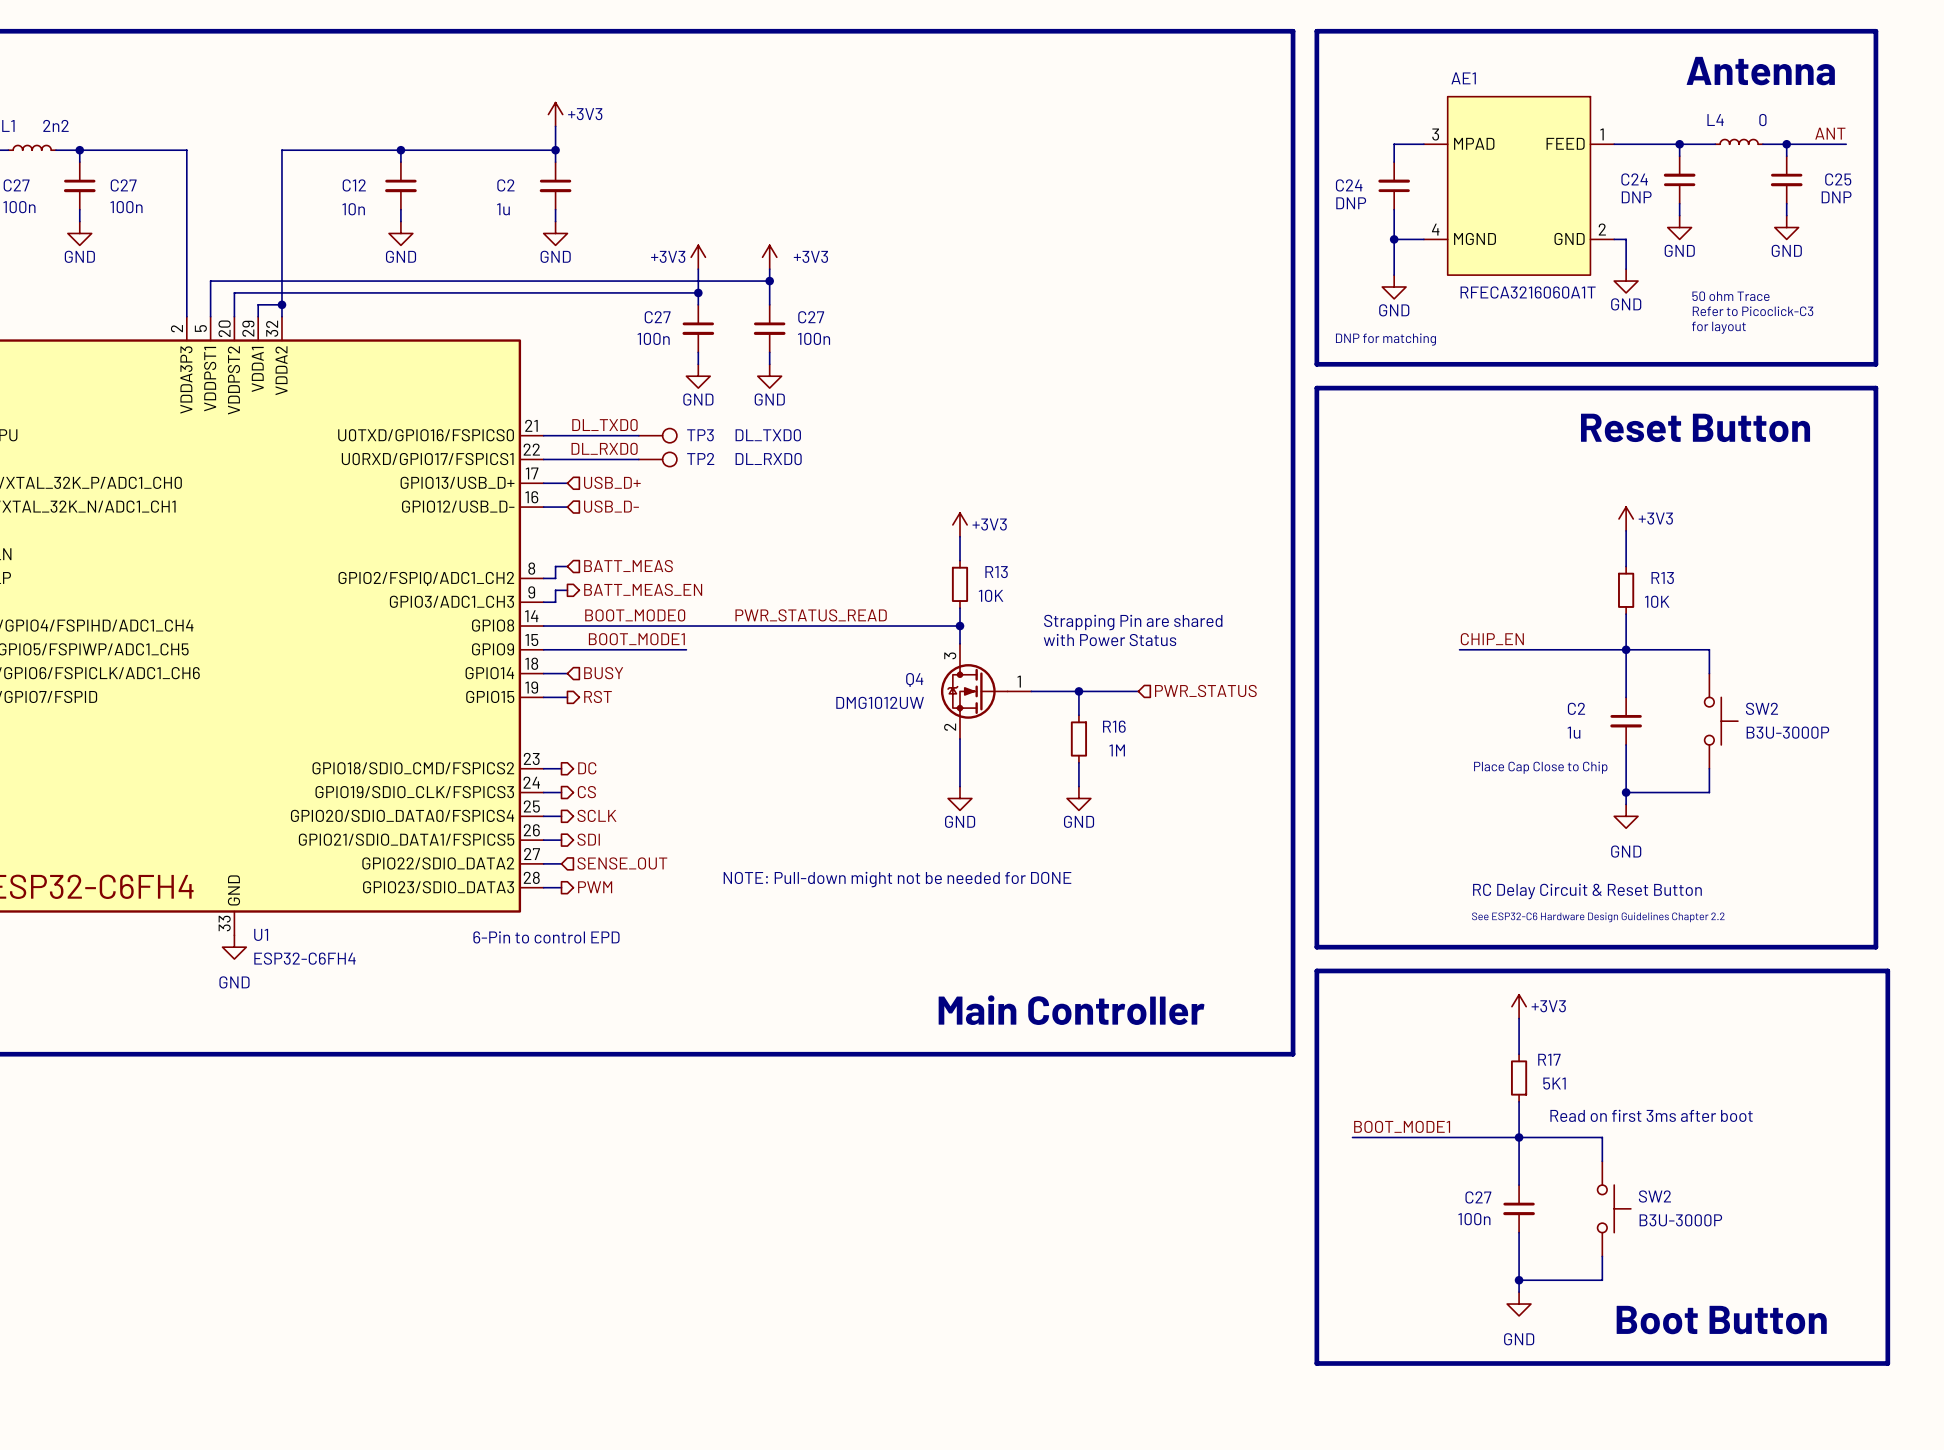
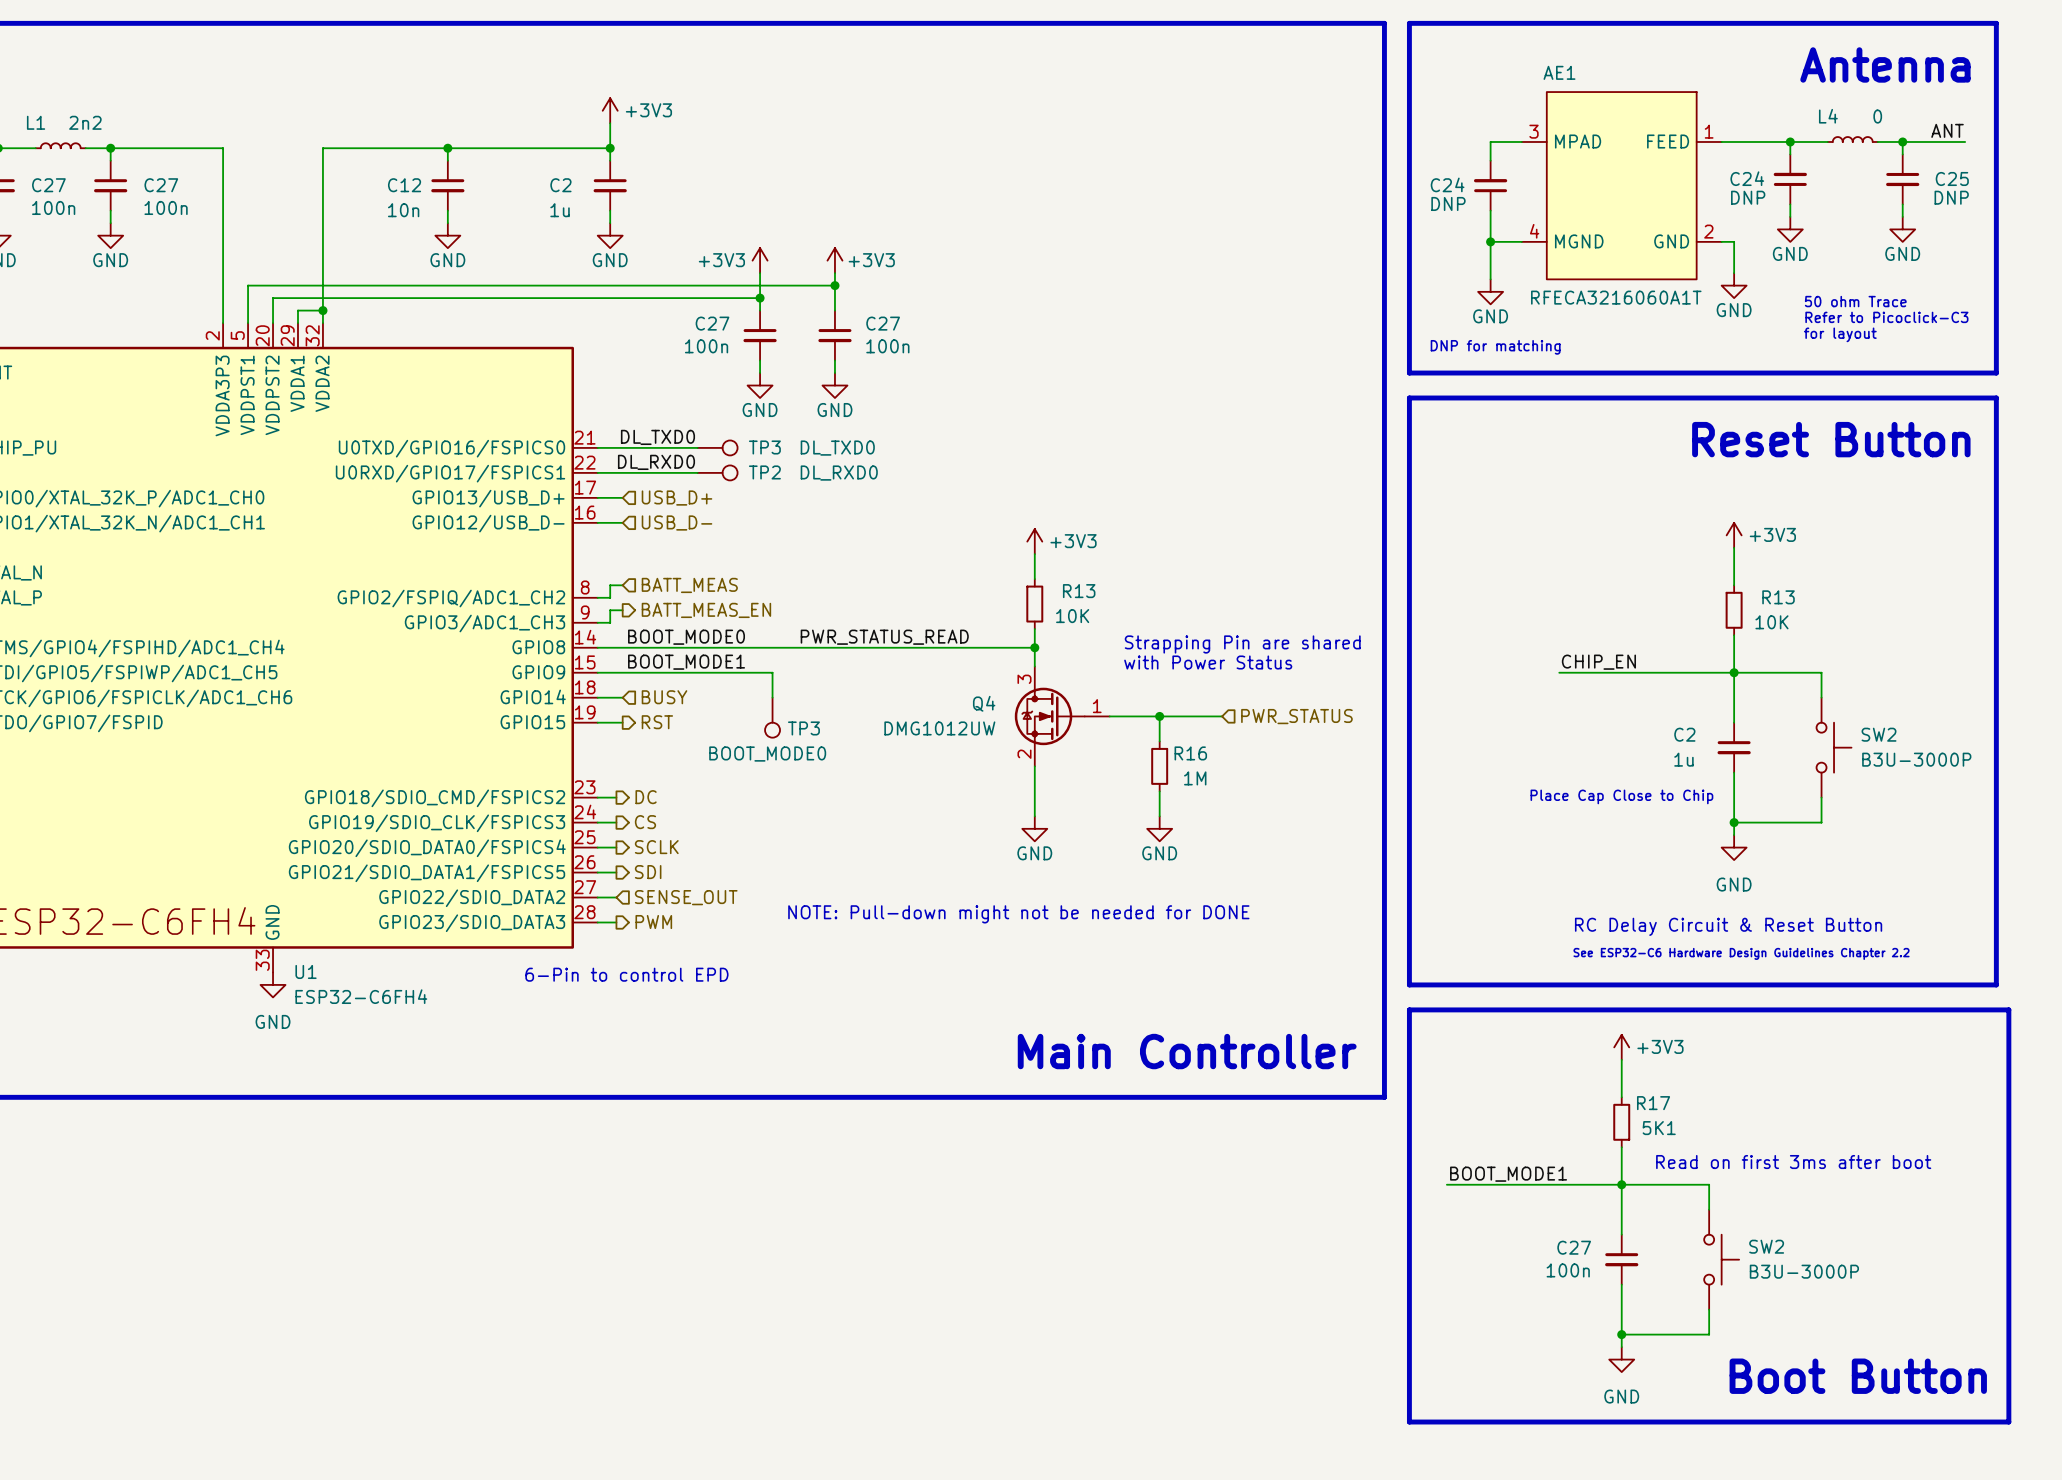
wire: none -> (747, 672) (772, 672) (772, 697)
TP3: none -> BOOT_MODE0 (772, 717)

